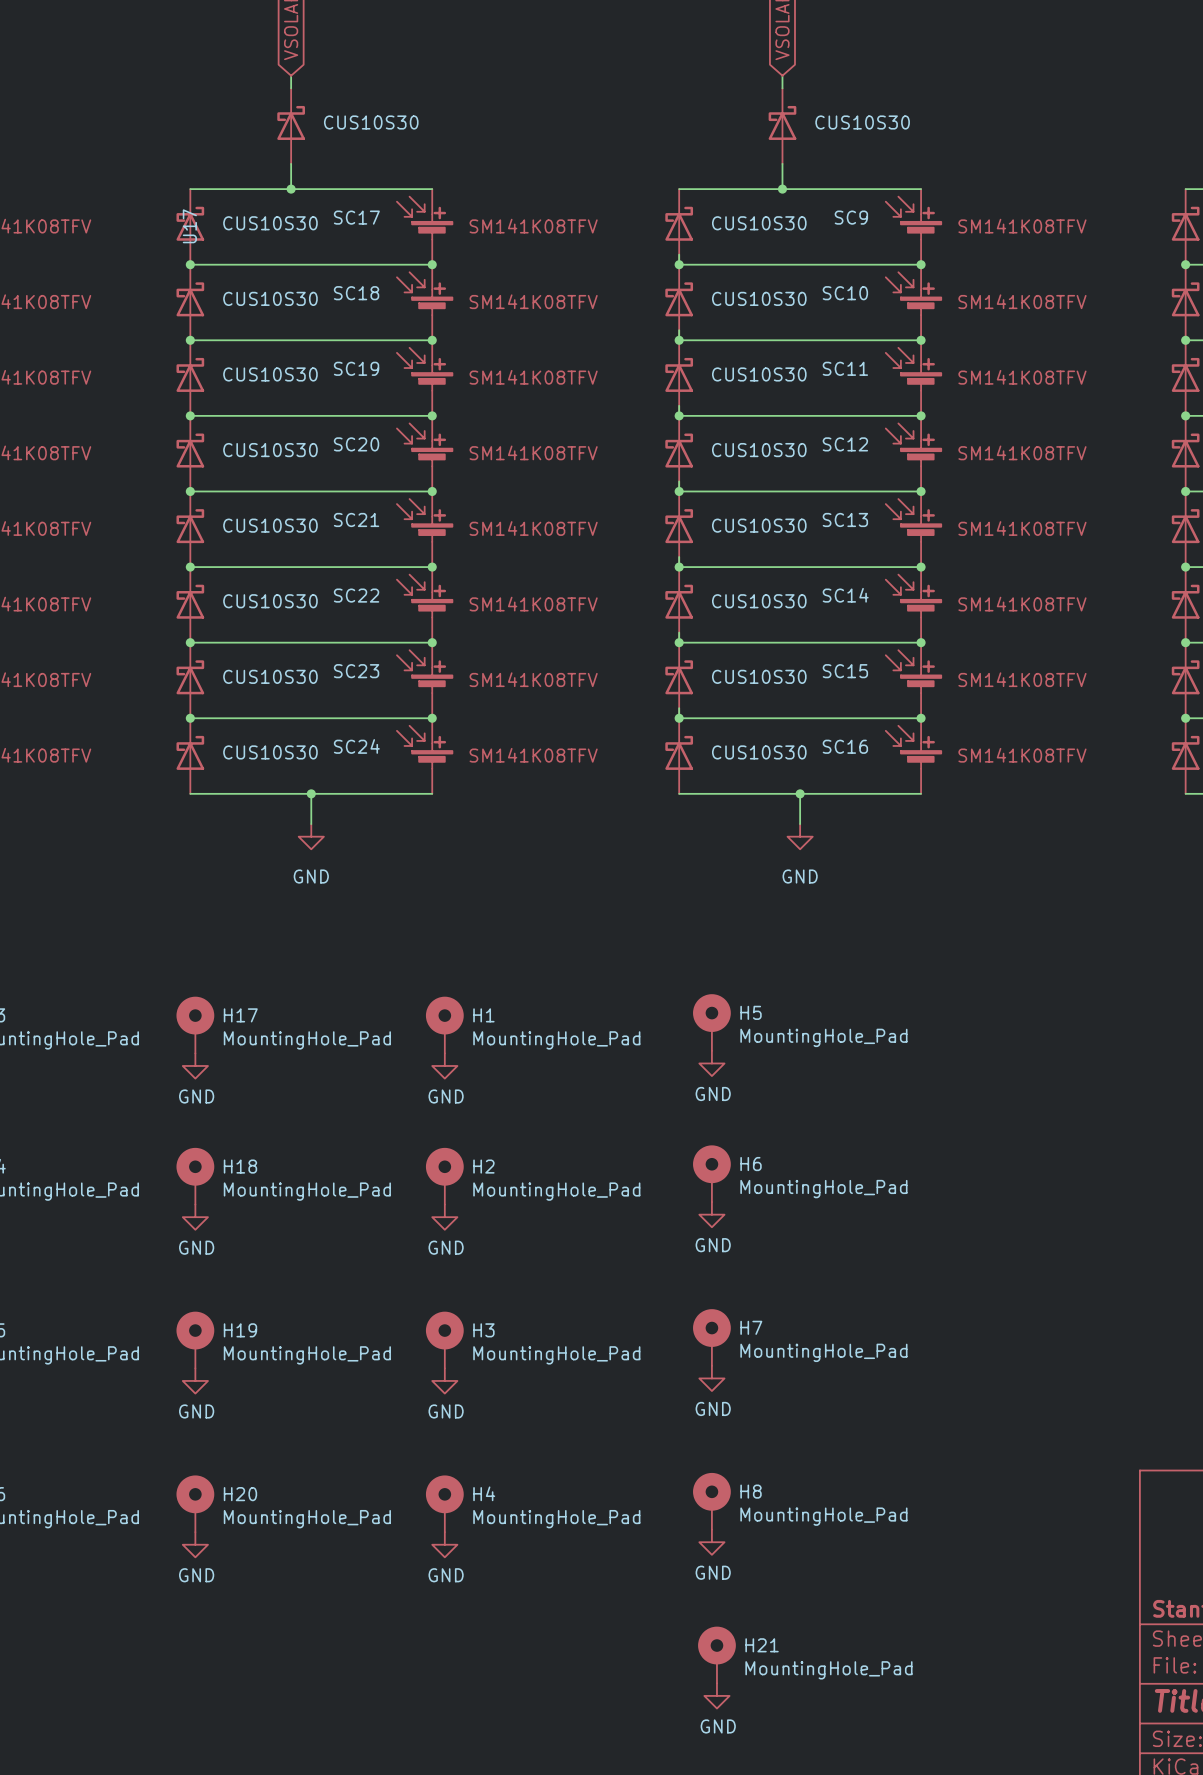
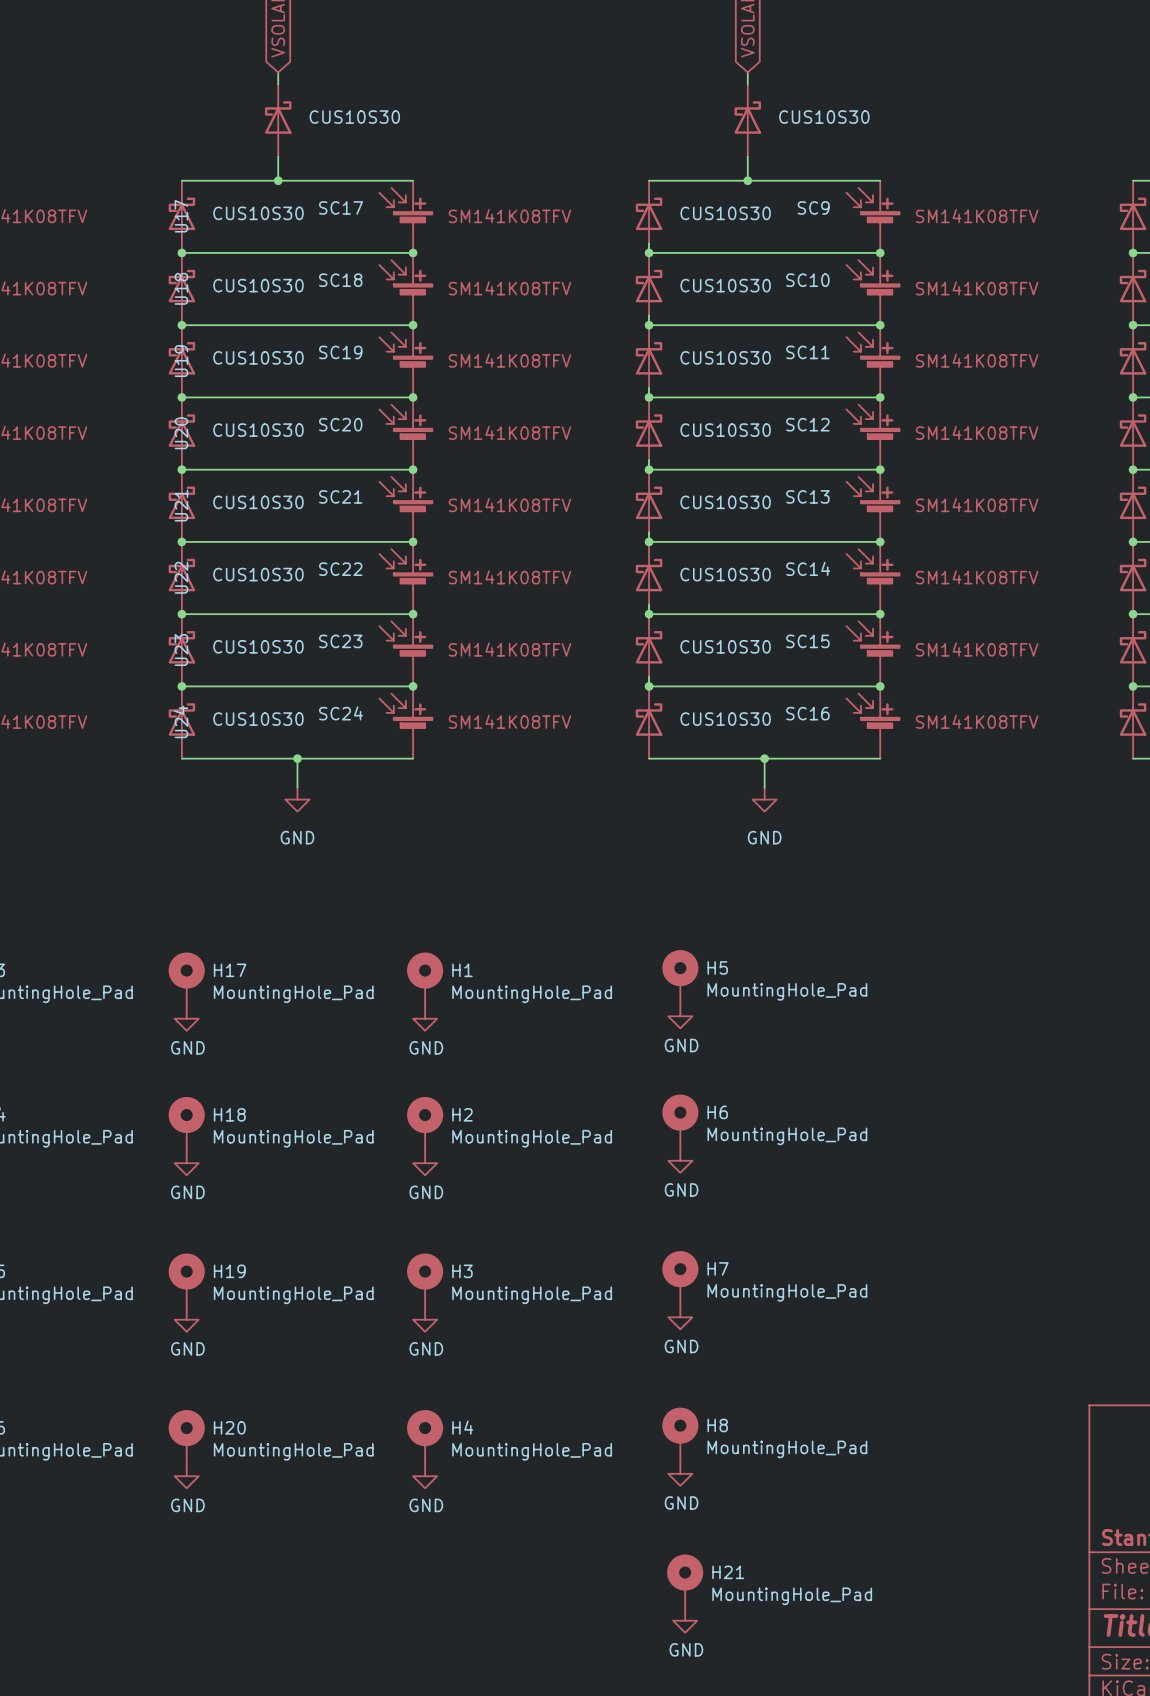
U18 name: none -> U18 (181, 288)
U19 name: none -> U19 (181, 361)
U20 name: none -> U20 (181, 433)
U21 name: none -> U21 (181, 505)
U22 name: none -> U22 (181, 577)
U23 name: none -> U23 (181, 650)
U24 name: none -> U24 (181, 721)

